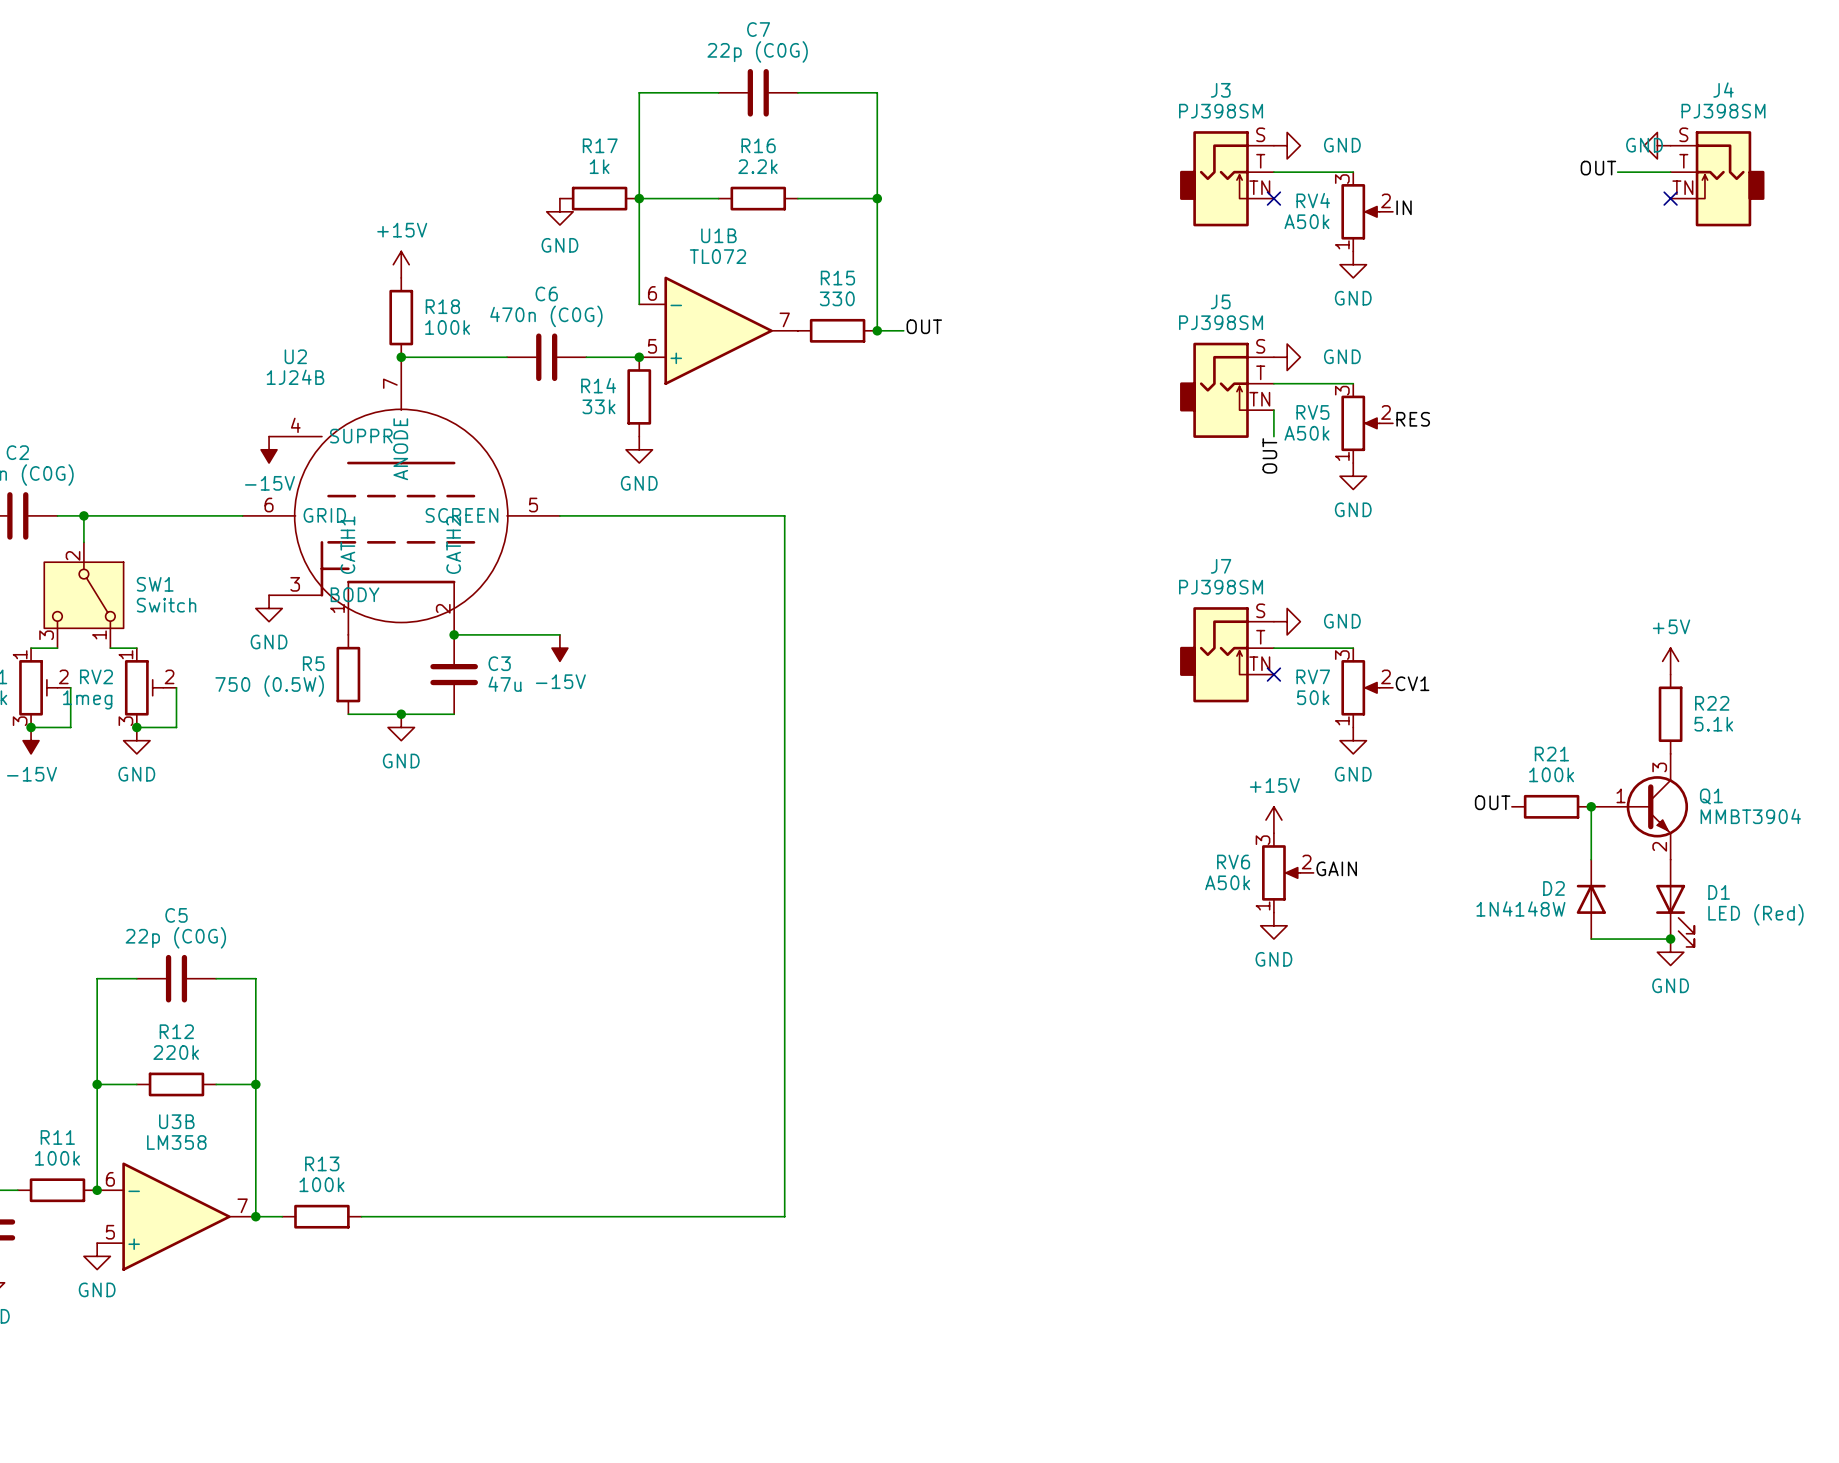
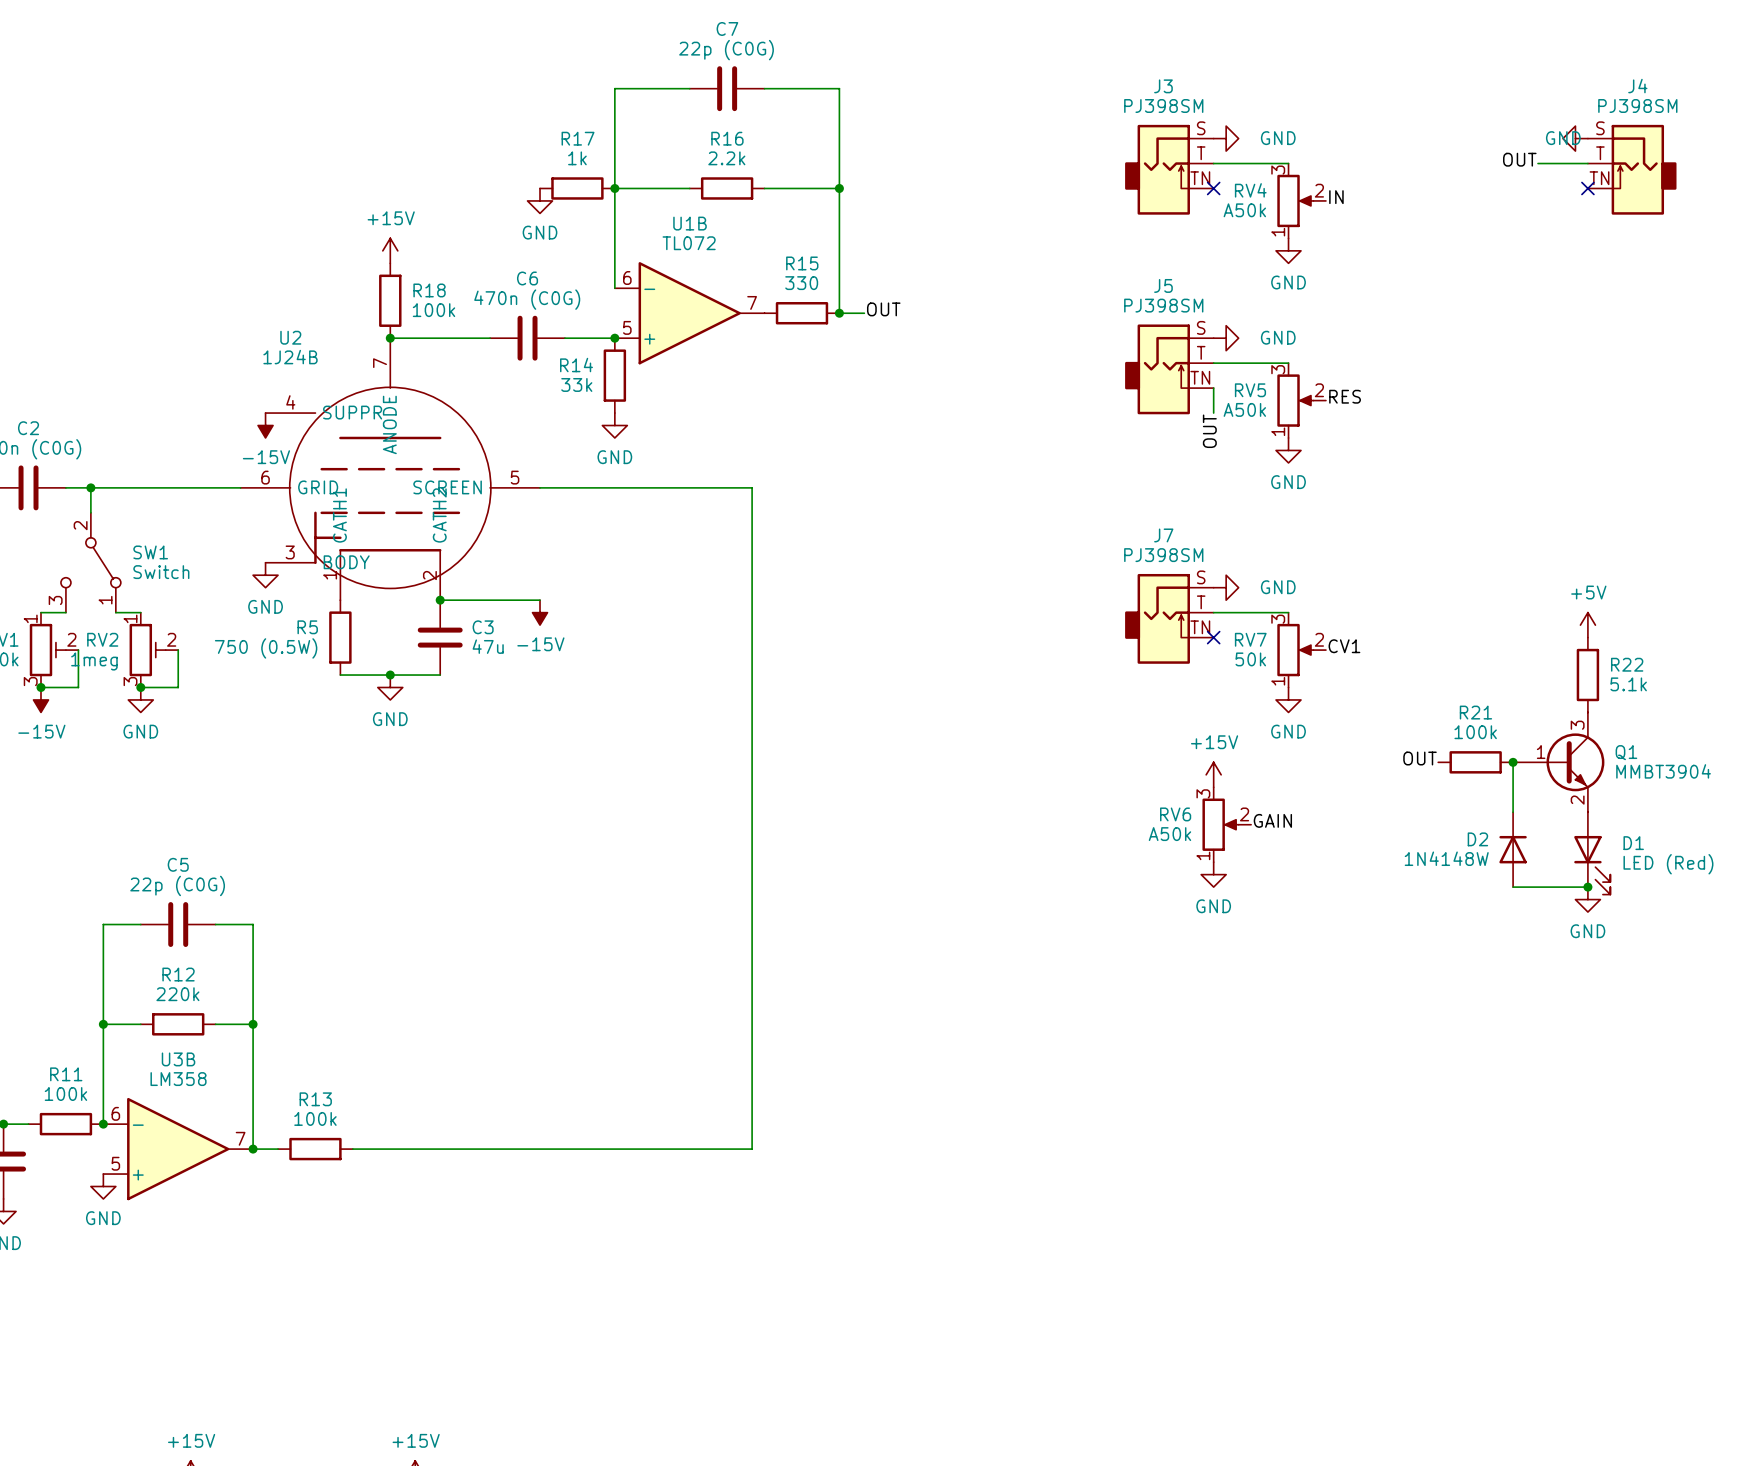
SW1 symbol: [44, 542, 124, 649] -> [60, 512, 121, 613]

